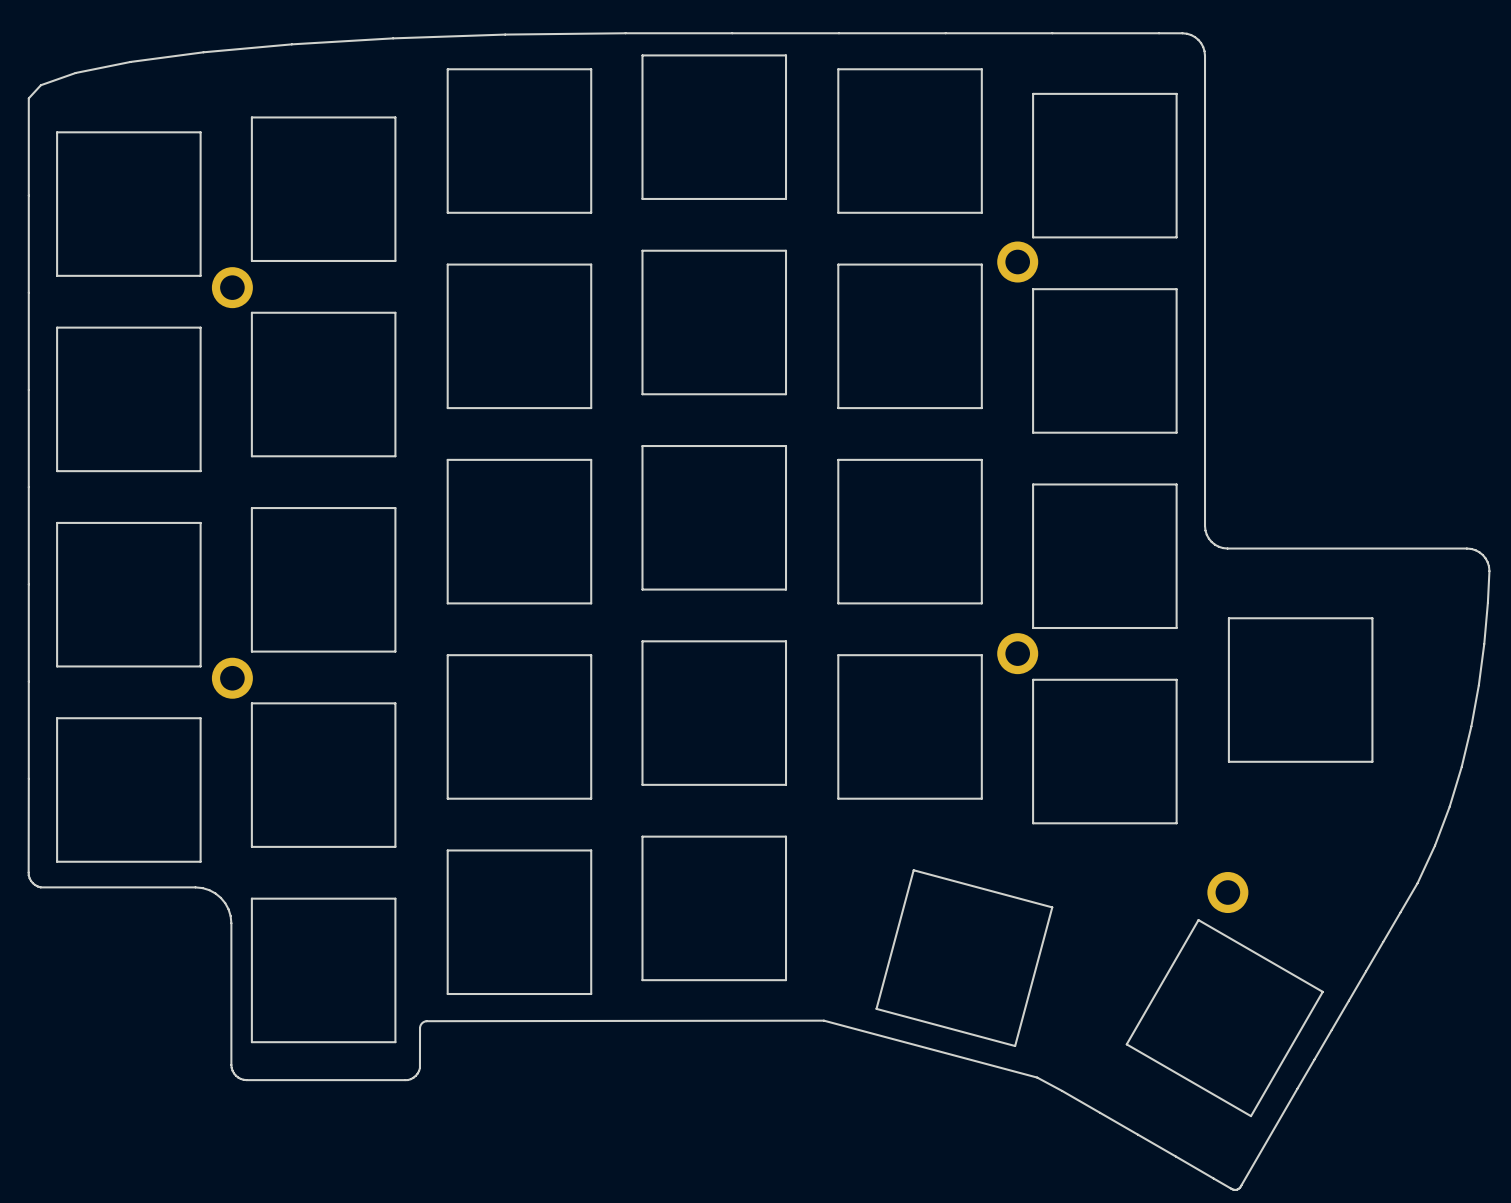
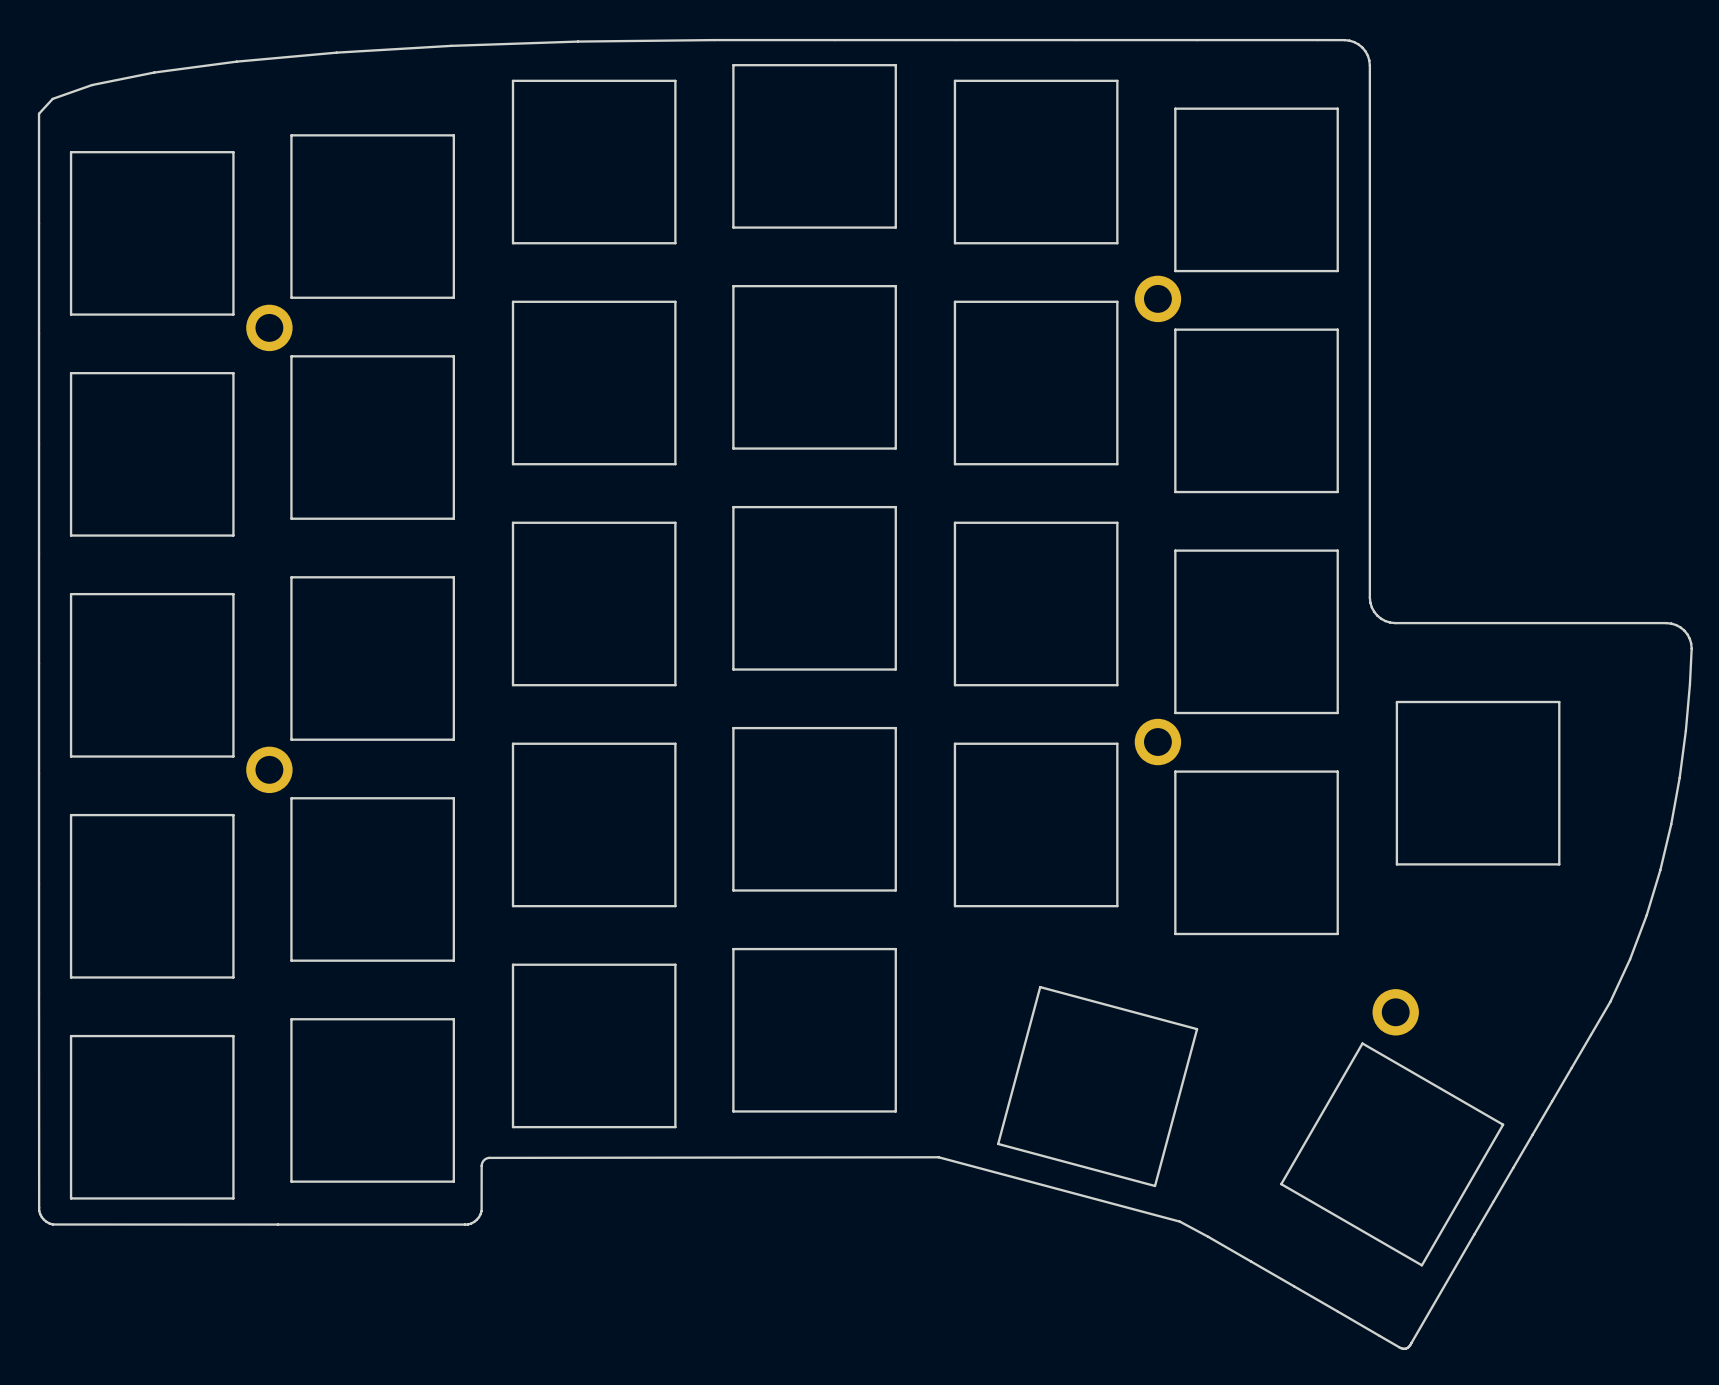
board edge: (28, 778) (28, 875) (35, 885) (40, 887) (195, 887) (209, 890) (225, 903) (231, 923) (231, 1067) (238, 1077) (246, 1080) -> (39, 883) (39, 1207) (41, 1217) (52, 1224) (285, 1224)
board edge: none -> (233, 1036) (71, 1036) (71, 1198) (233, 1198) (233, 1036)

